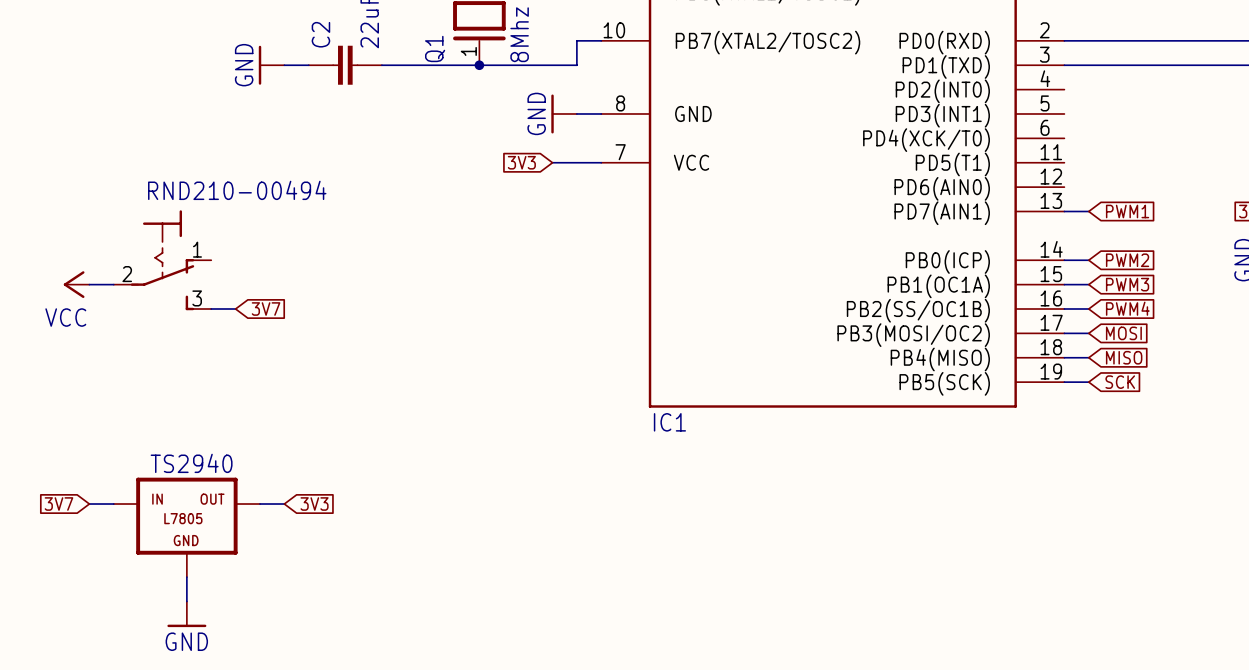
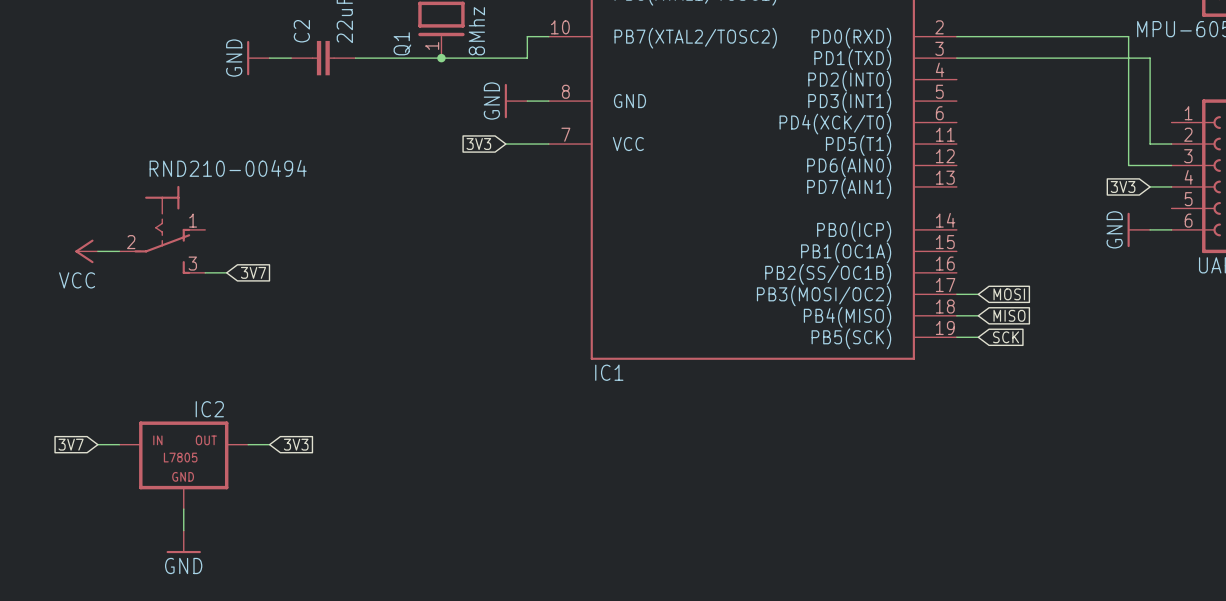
wire: (1064, 211) (1088, 211) -> none
global label: PWM1 (1127, 211) -> none
wire: (1064, 260) (1088, 260) -> none
global label: PWM2 (1127, 260) -> none
wire: (1064, 284) (1088, 284) -> none
global label: PWM3 (1127, 284) -> none
global label: PWM4 (1127, 308) -> none
wire: (1064, 309) (1088, 309) -> none
TS2940 name: TS2940 (191, 463) -> IC2 (209, 409)

